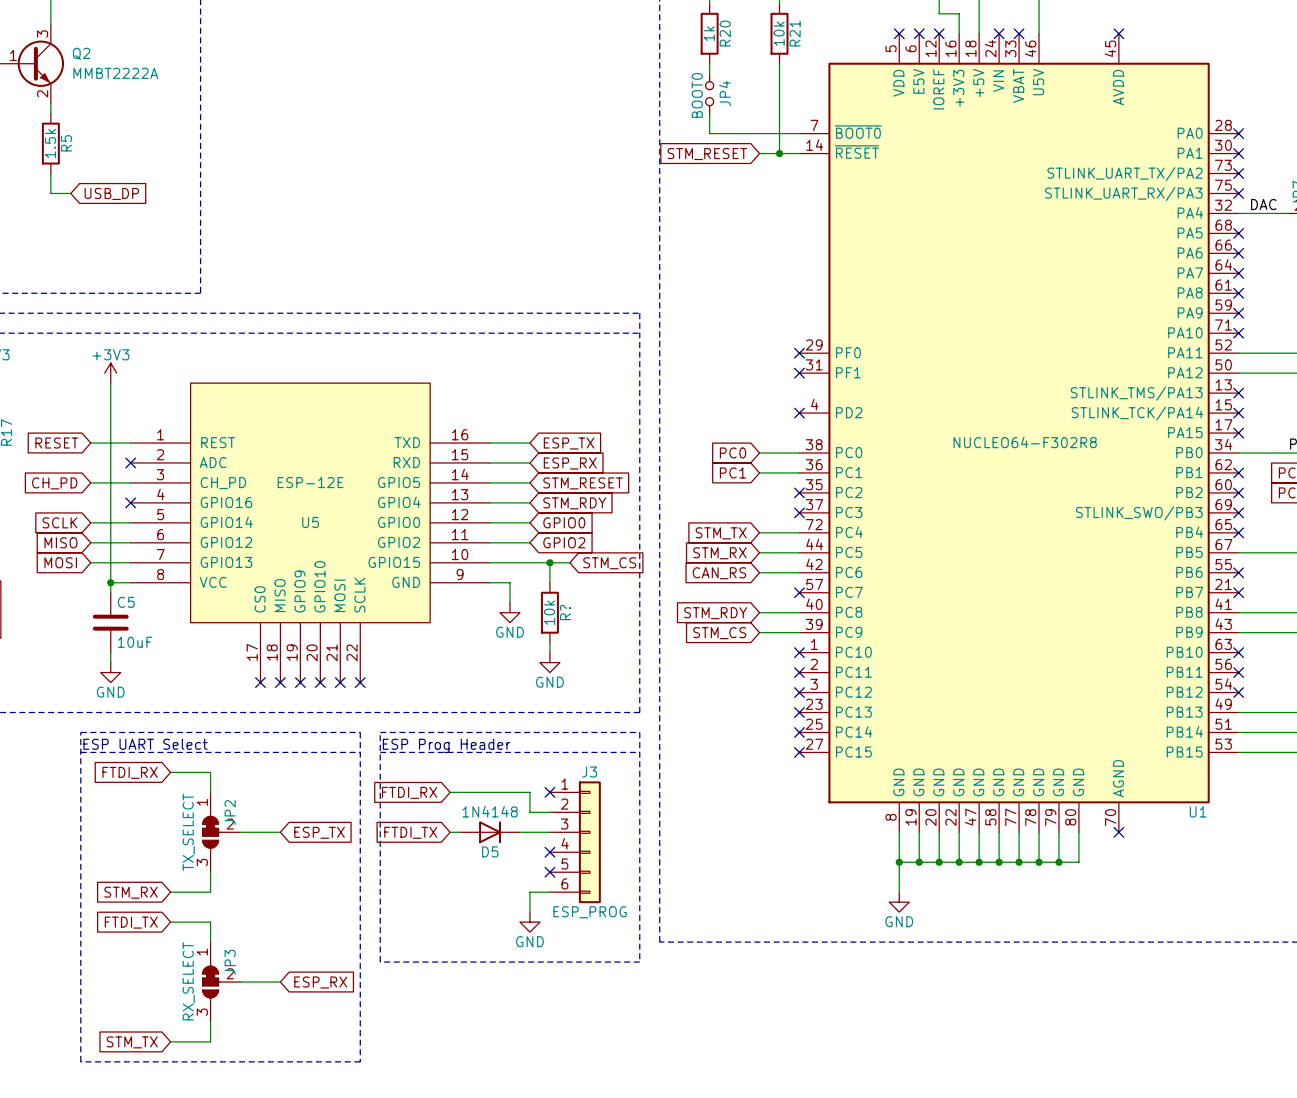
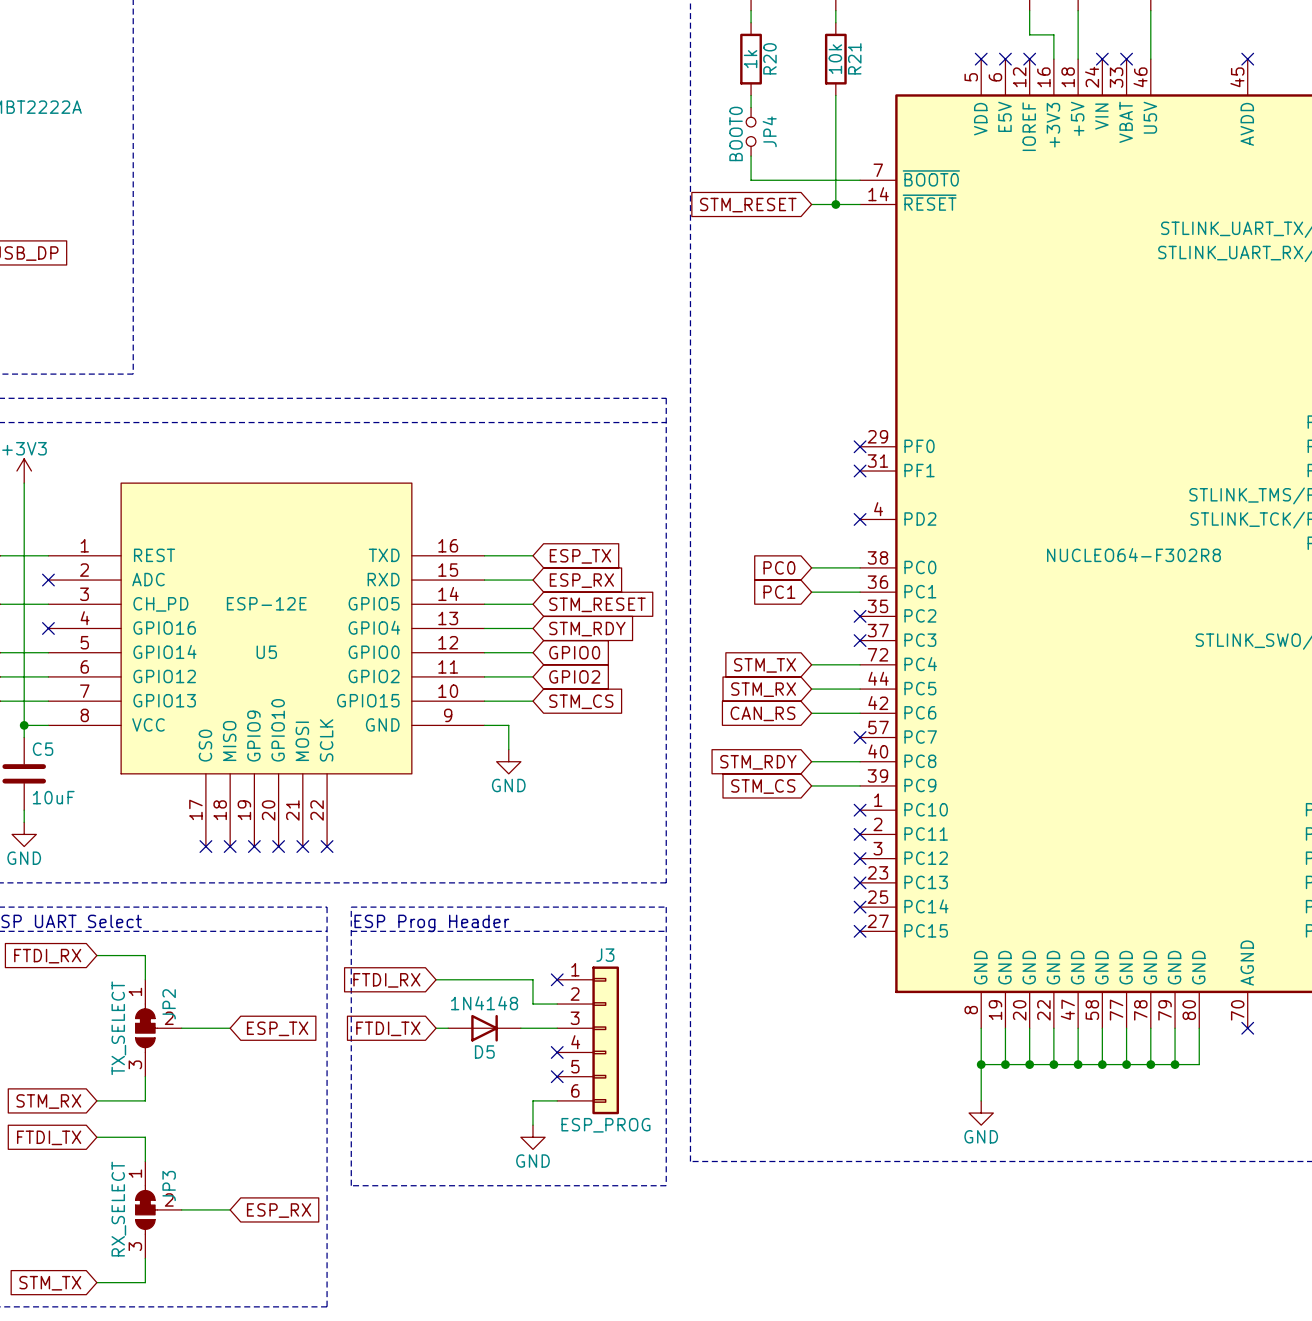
wire: (529, 562) (569, 562) -> none
wire: (549, 562) (549, 582) -> none
junction: (549, 562) -> none
global label position: STM_CS (609, 563) -> STM_CS (581, 701)
R?: 10k (549, 612) -> none
wire: (549, 642) (549, 652) -> none
power symbol: GND (549, 662) -> none

